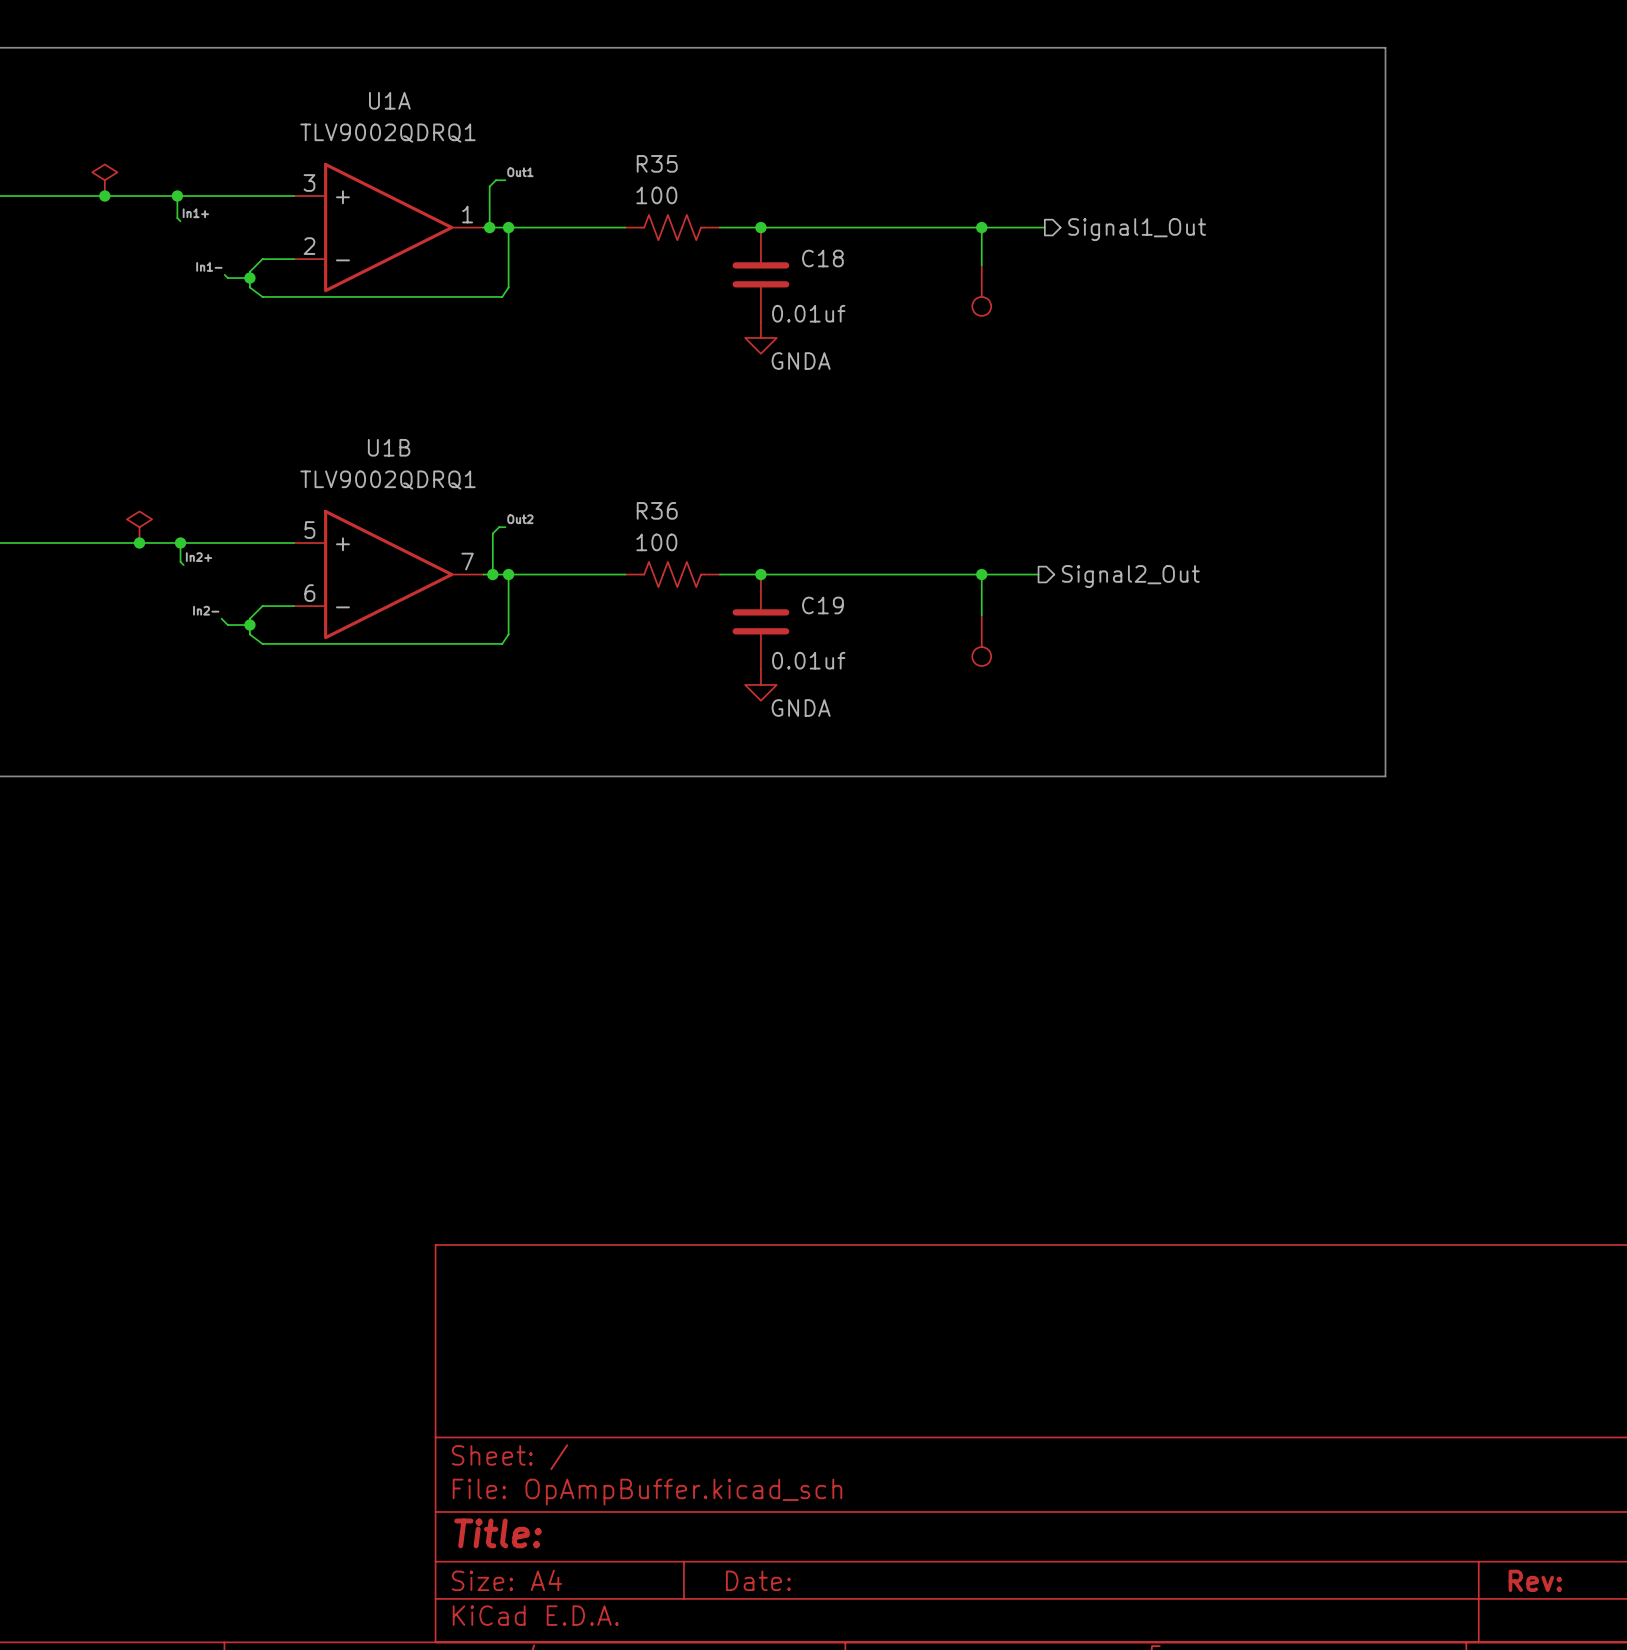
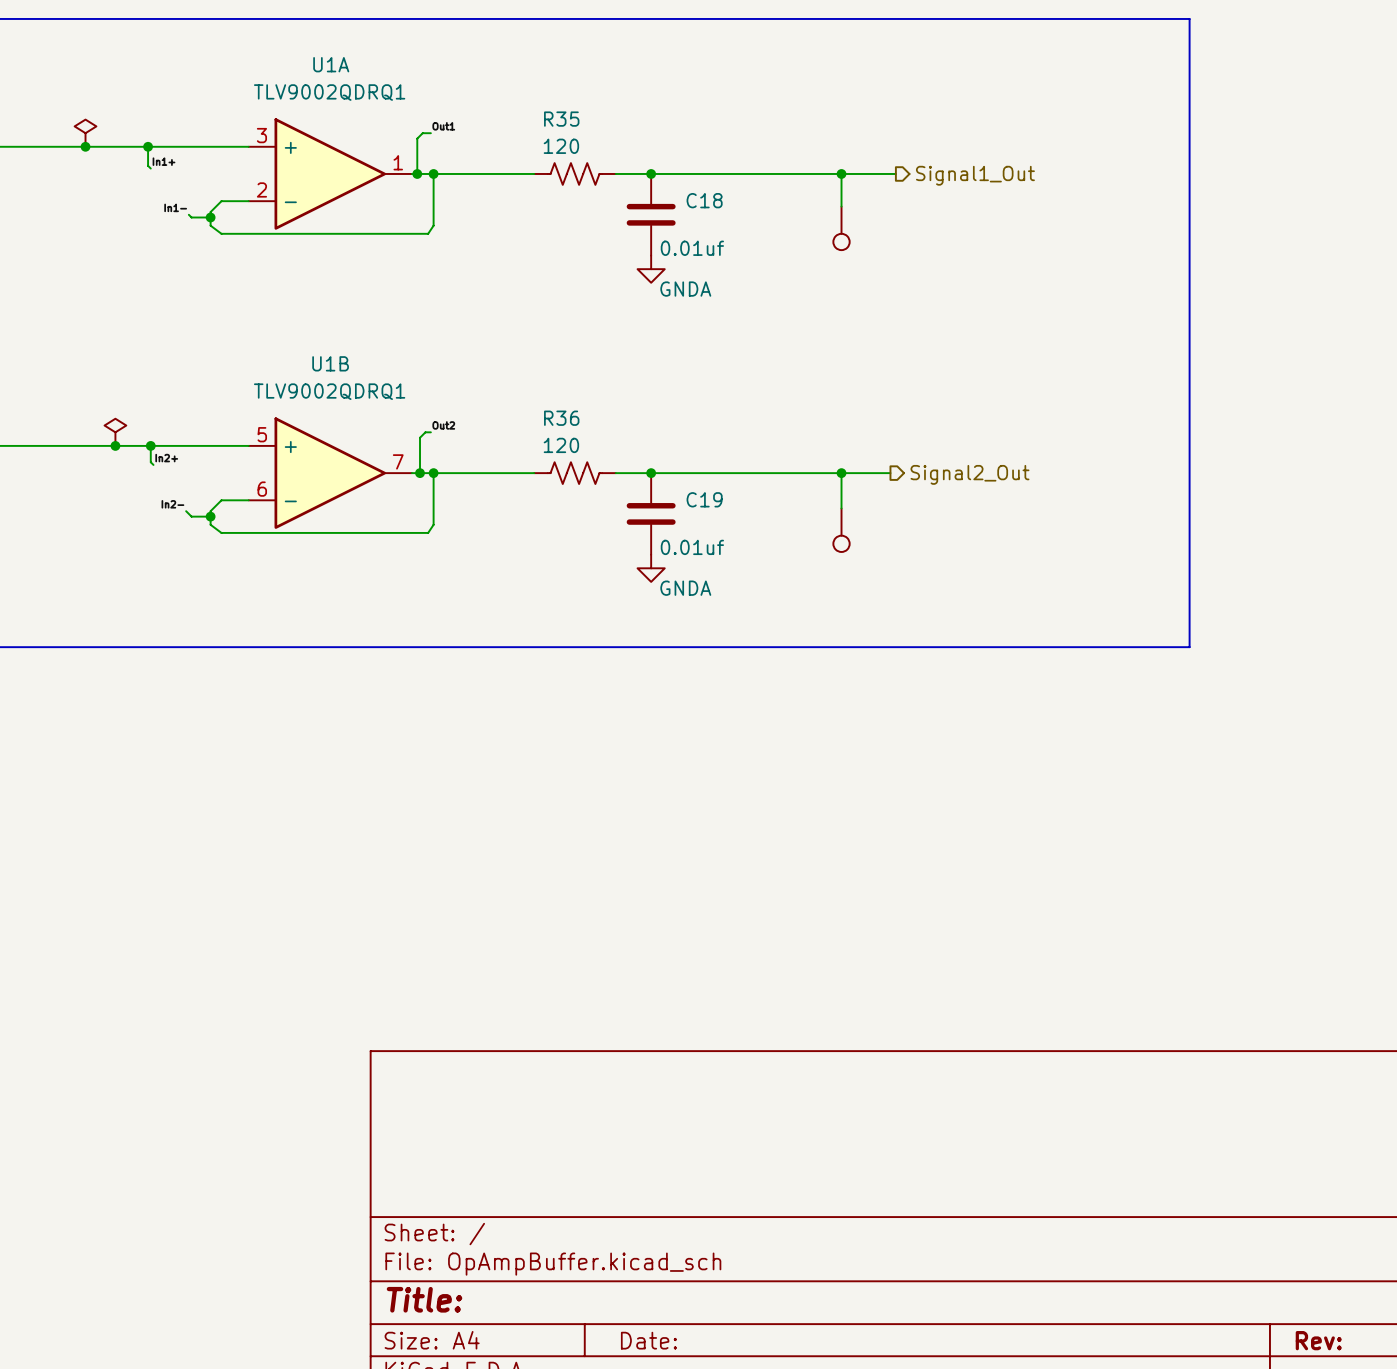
R35 value: 100 (656, 195) -> 120 (561, 146)
R36 value: 100 (656, 542) -> 120 (561, 445)

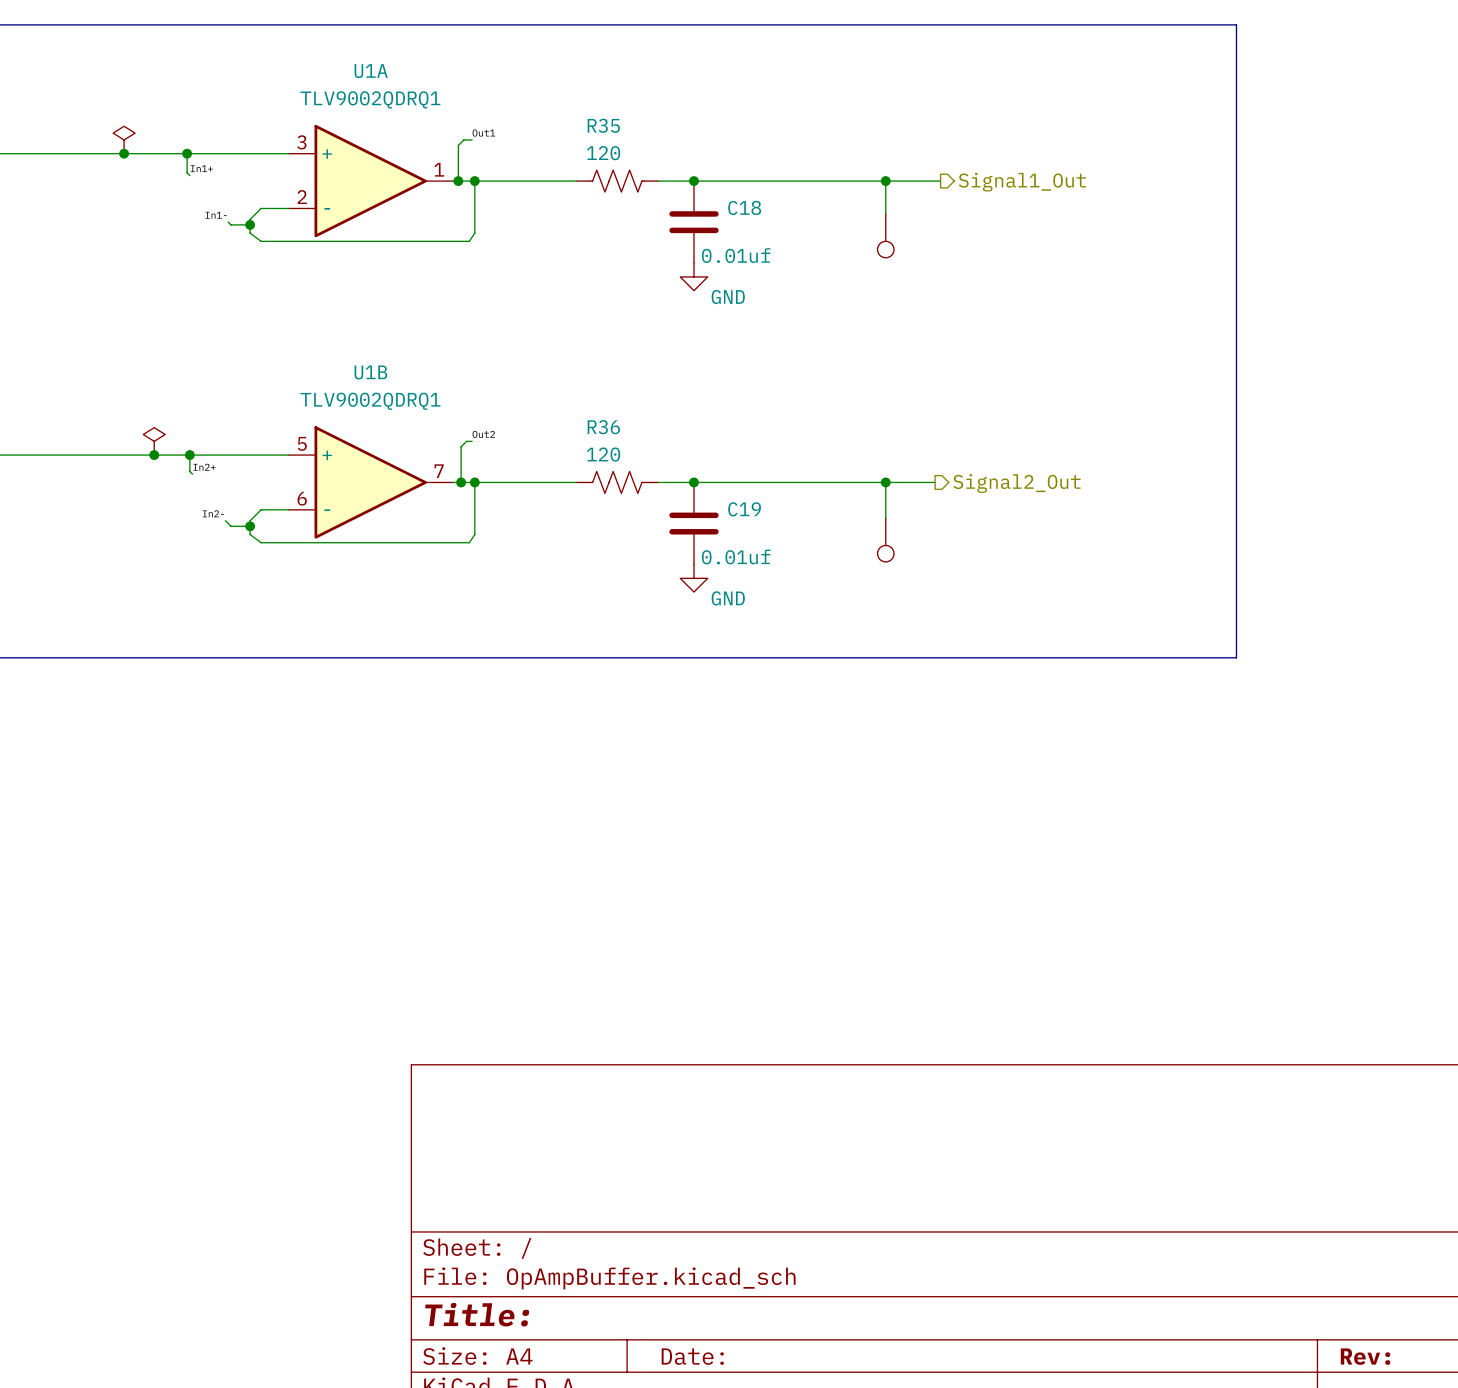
power symbol: GNDA (651, 269) -> GND (693, 276)
power symbol: GNDA (651, 568) -> GND (693, 578)

